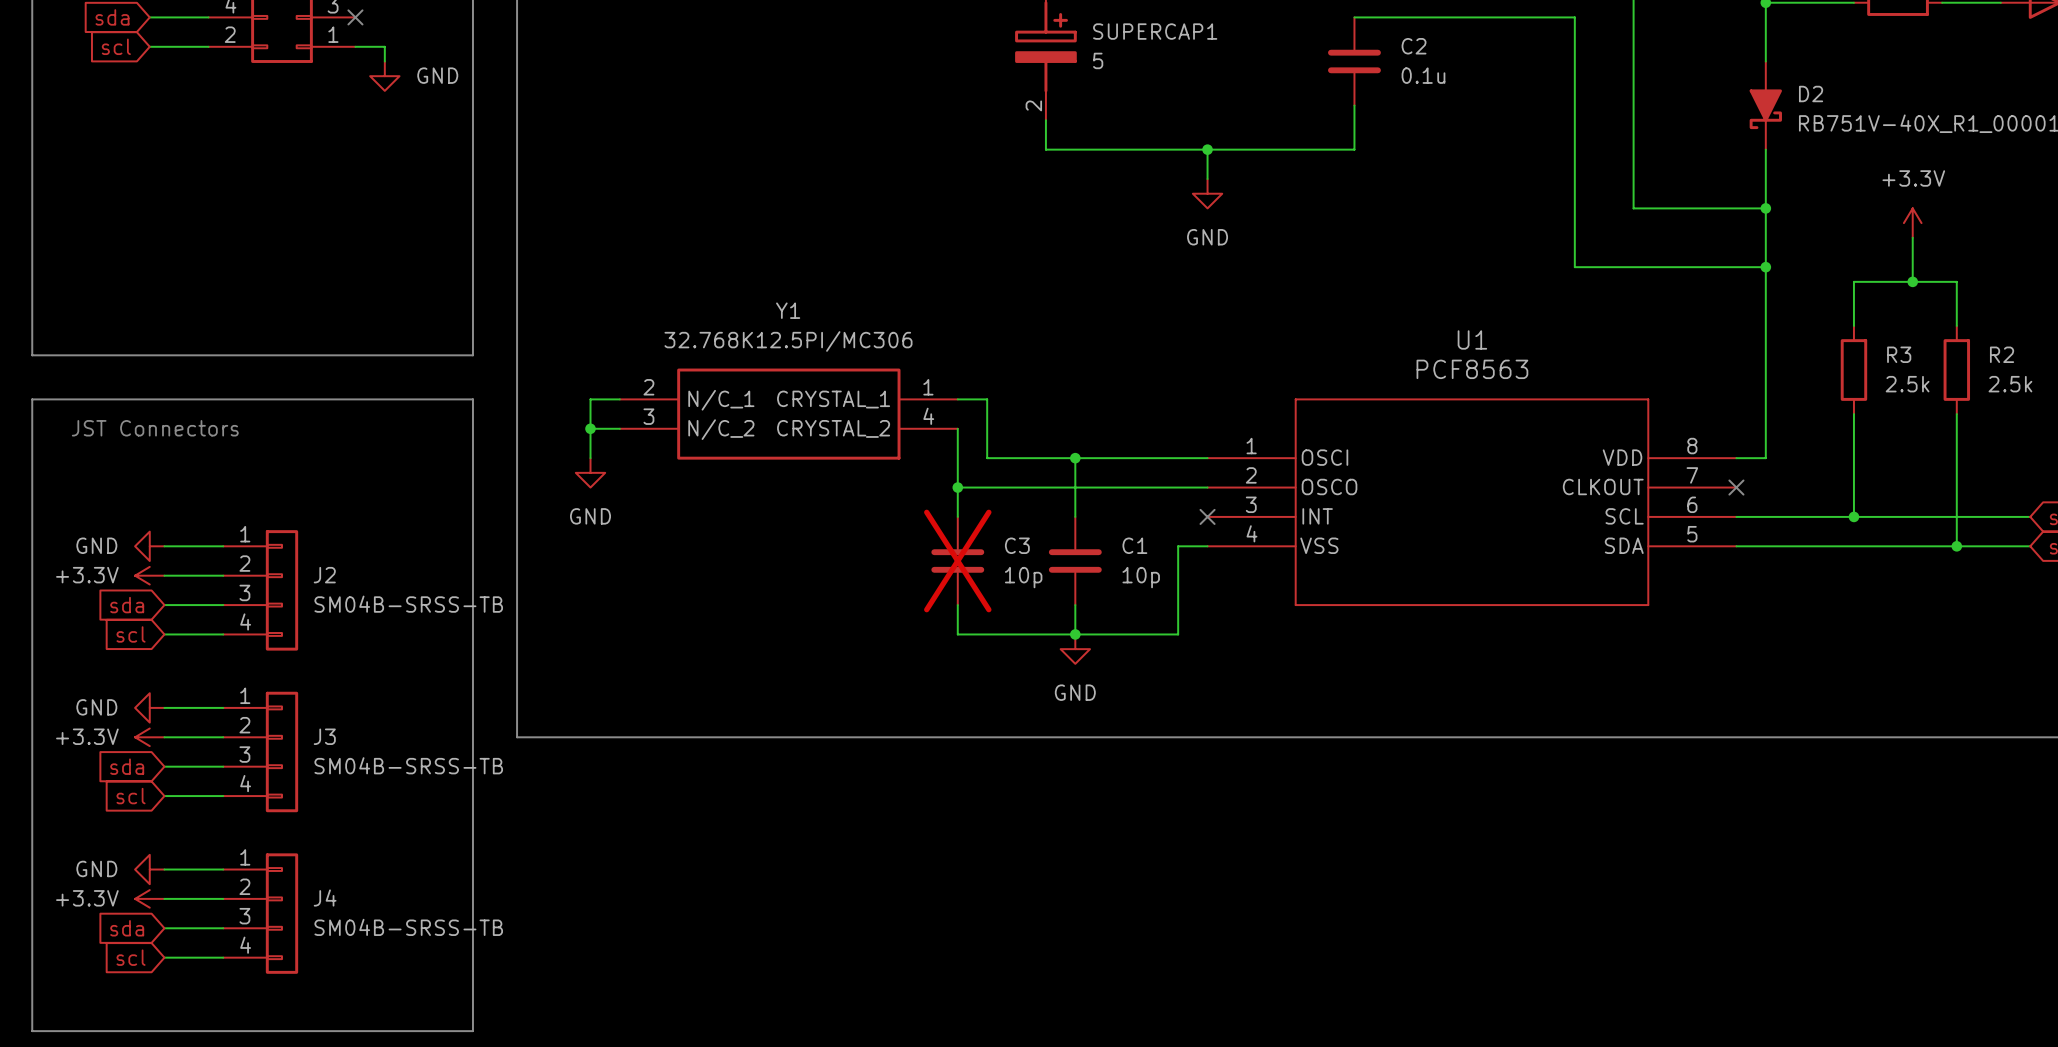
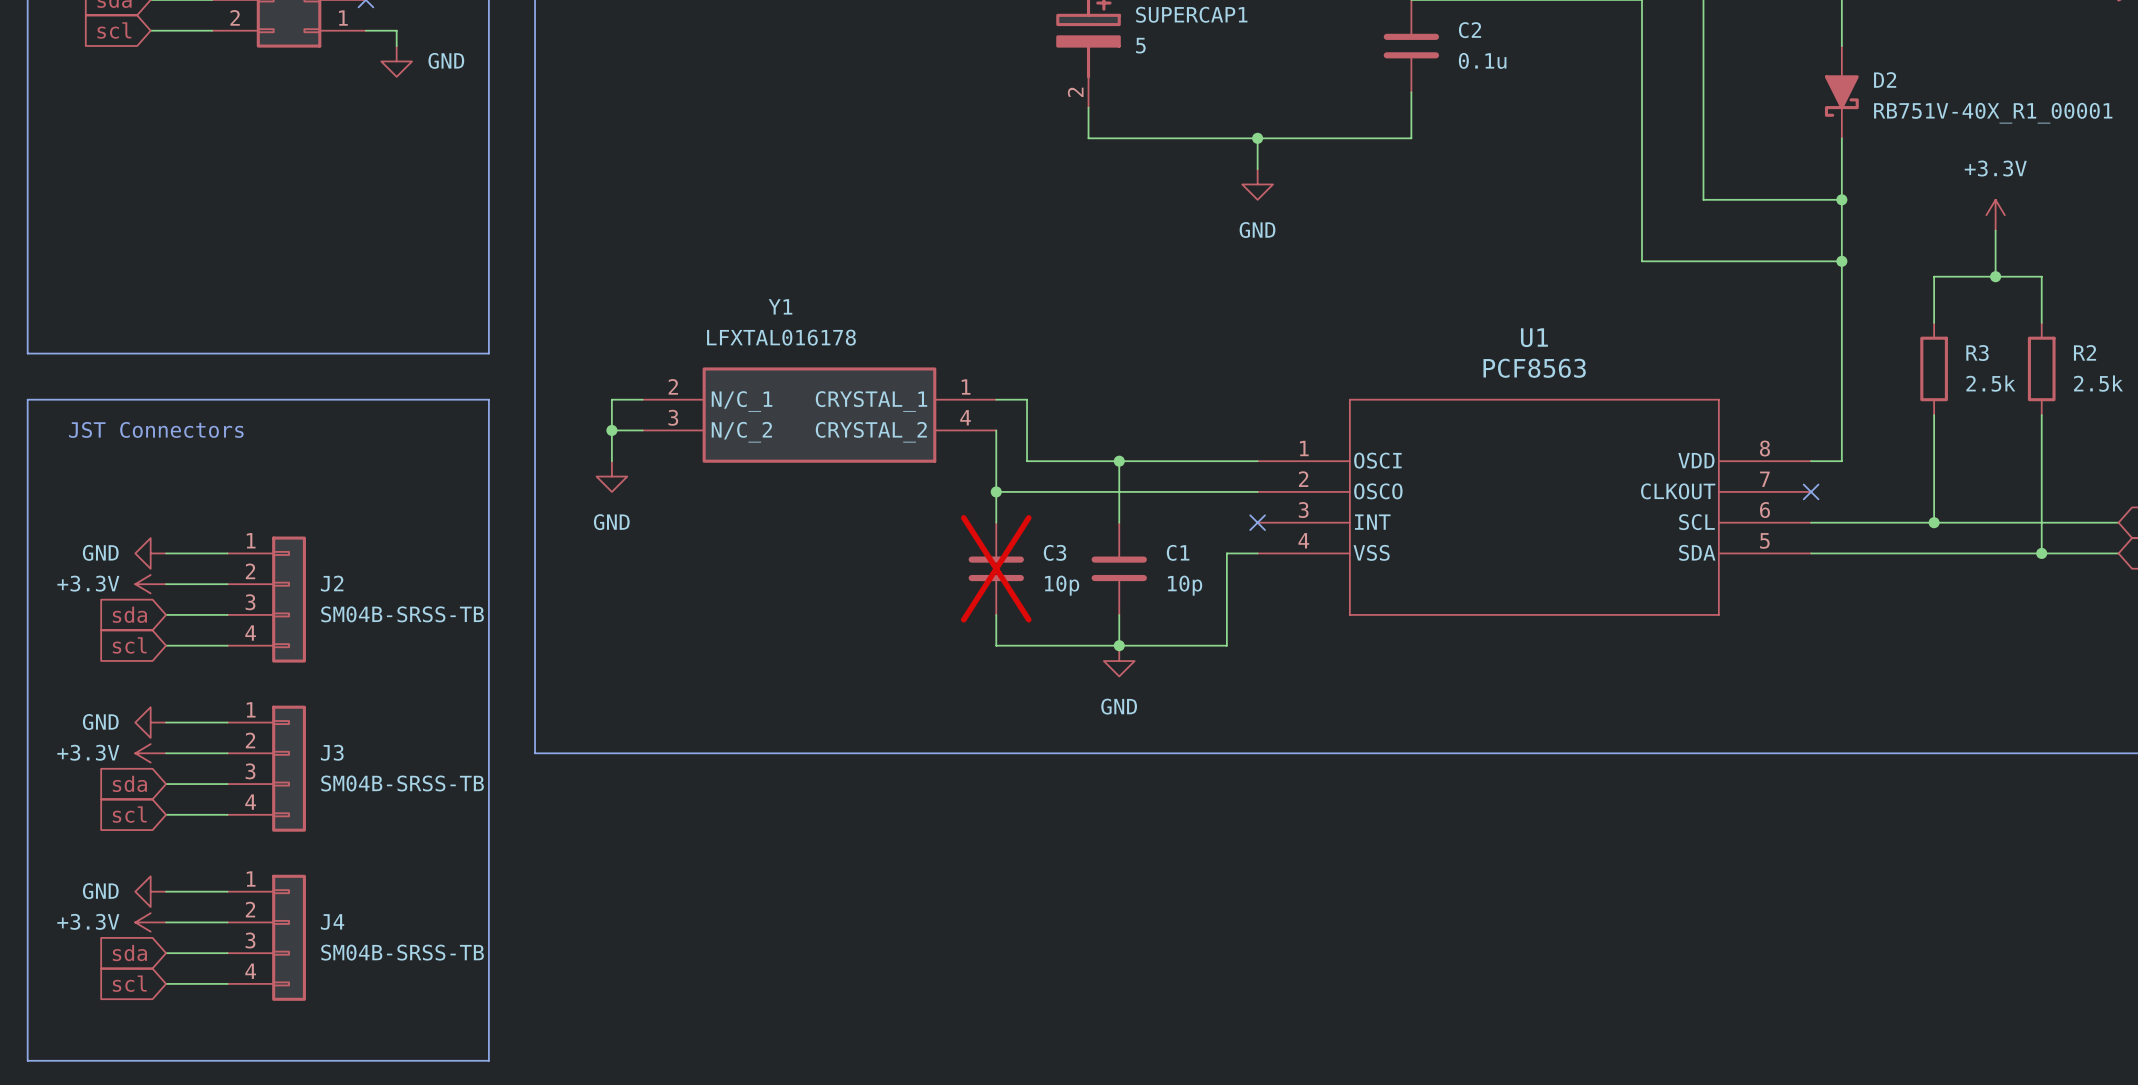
Y1 name position: Y1 (788, 310) -> Y1 (780, 306)
Y1 value: 32.768K12.5PI/MC306 (788, 341) -> LFXTAL016178 (781, 337)

